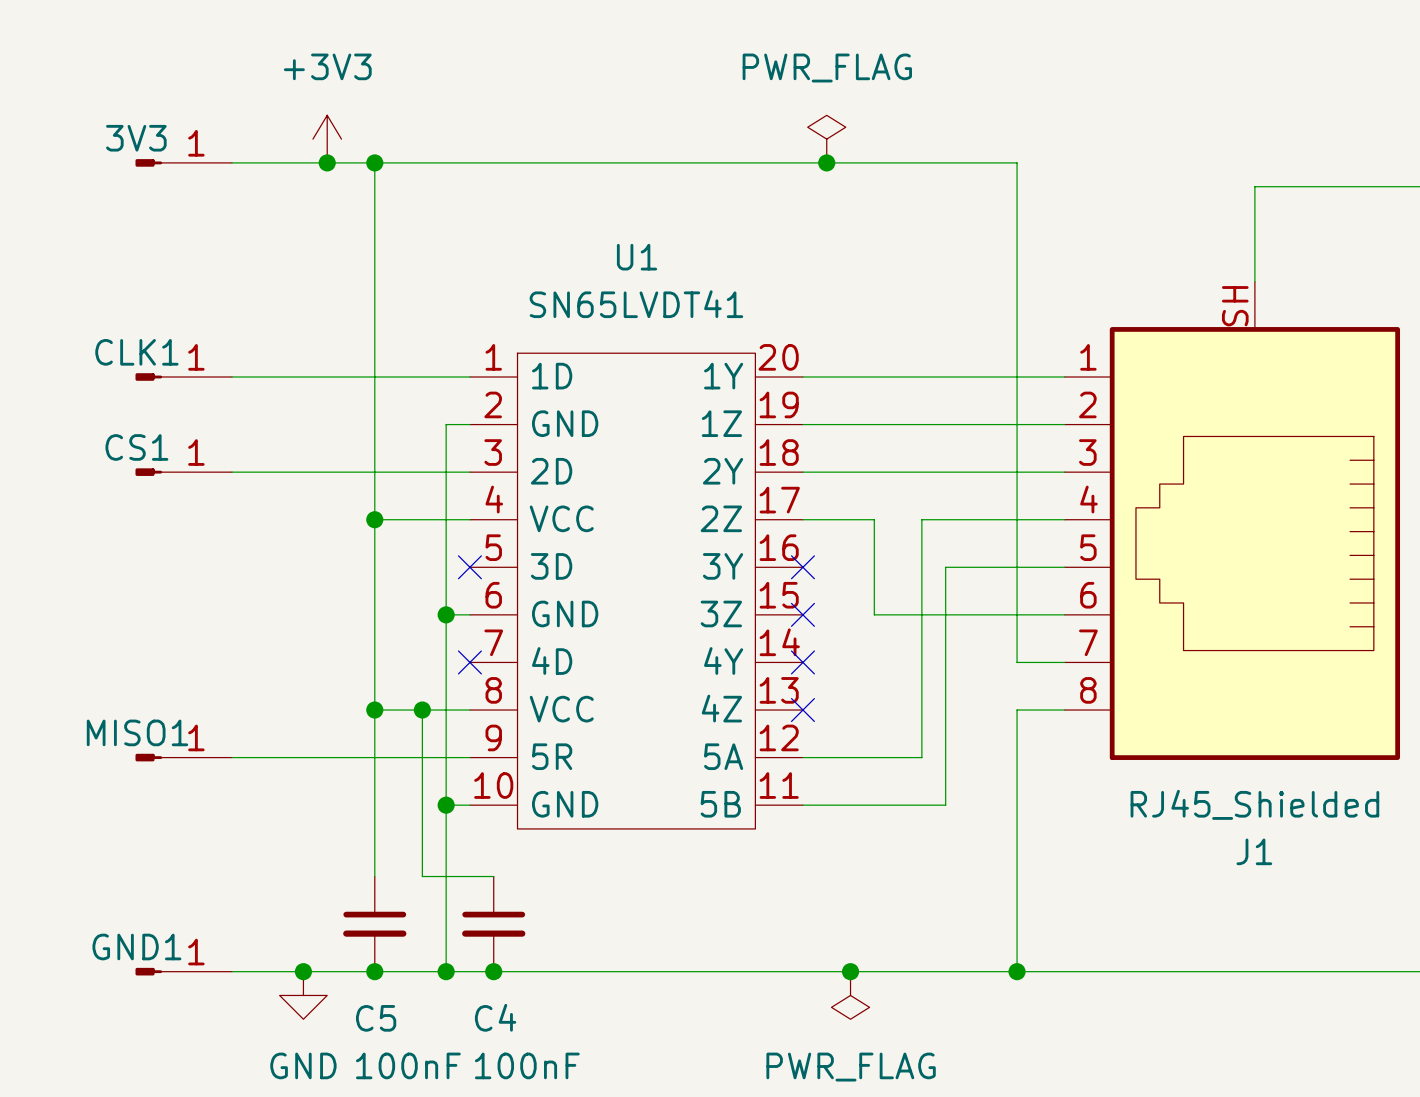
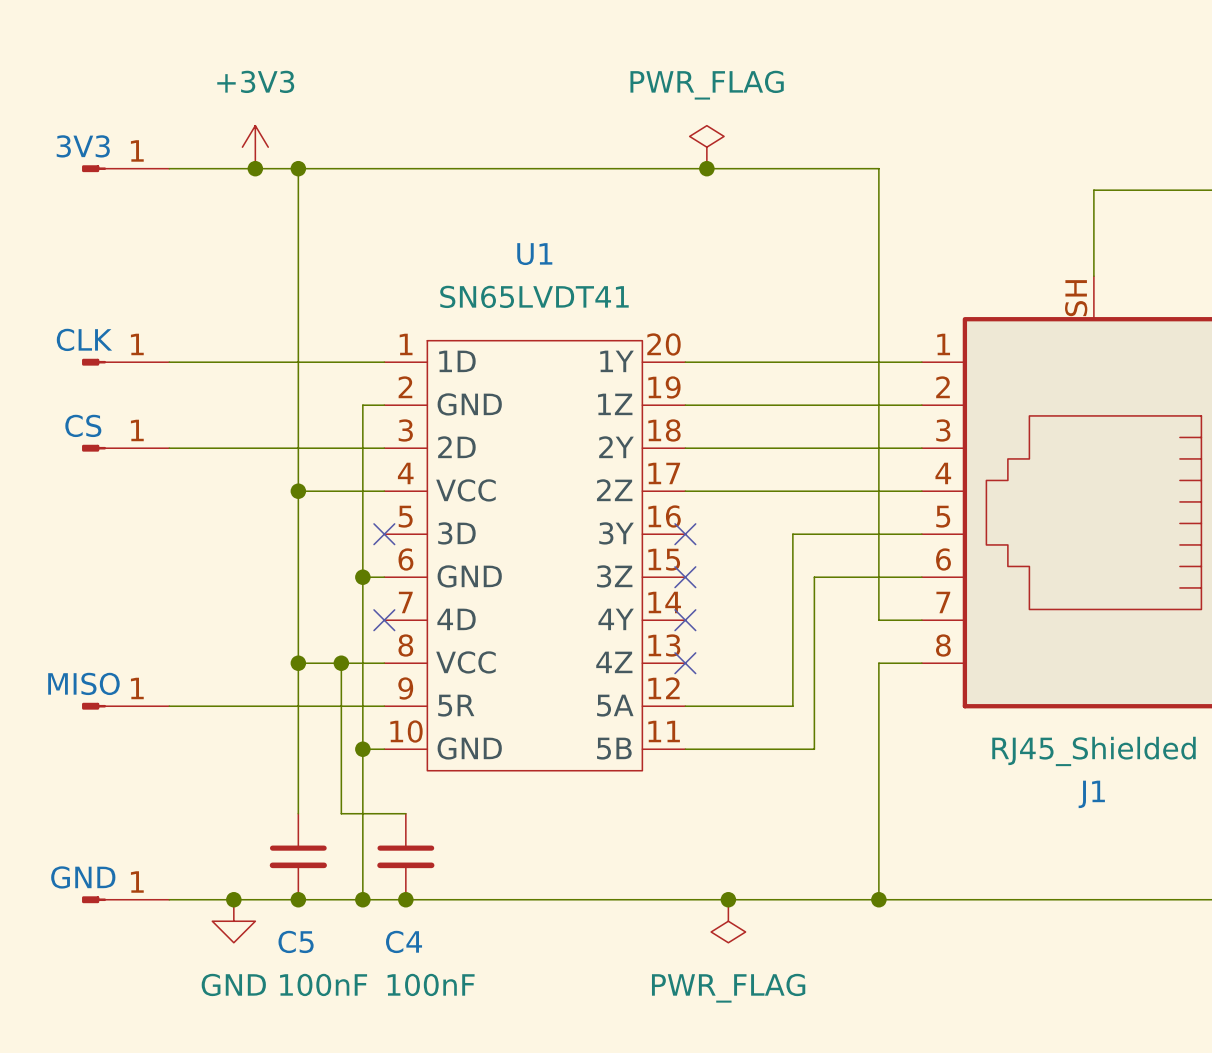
CLK1 name: CLK1 (136, 352) -> CLK (84, 339)
CS1 name: CS1 (136, 447) -> CS (83, 425)
wire: (874, 519) (874, 614) (945, 614) (945, 567) -> (749, 491) (792, 491)
wire: (921, 519) (921, 567) -> (814, 534) (792, 534)
MISO1 name: MISO1 (137, 732) -> MISO (83, 683)
GND1 name: GND1 (136, 946) -> GND (83, 877)

